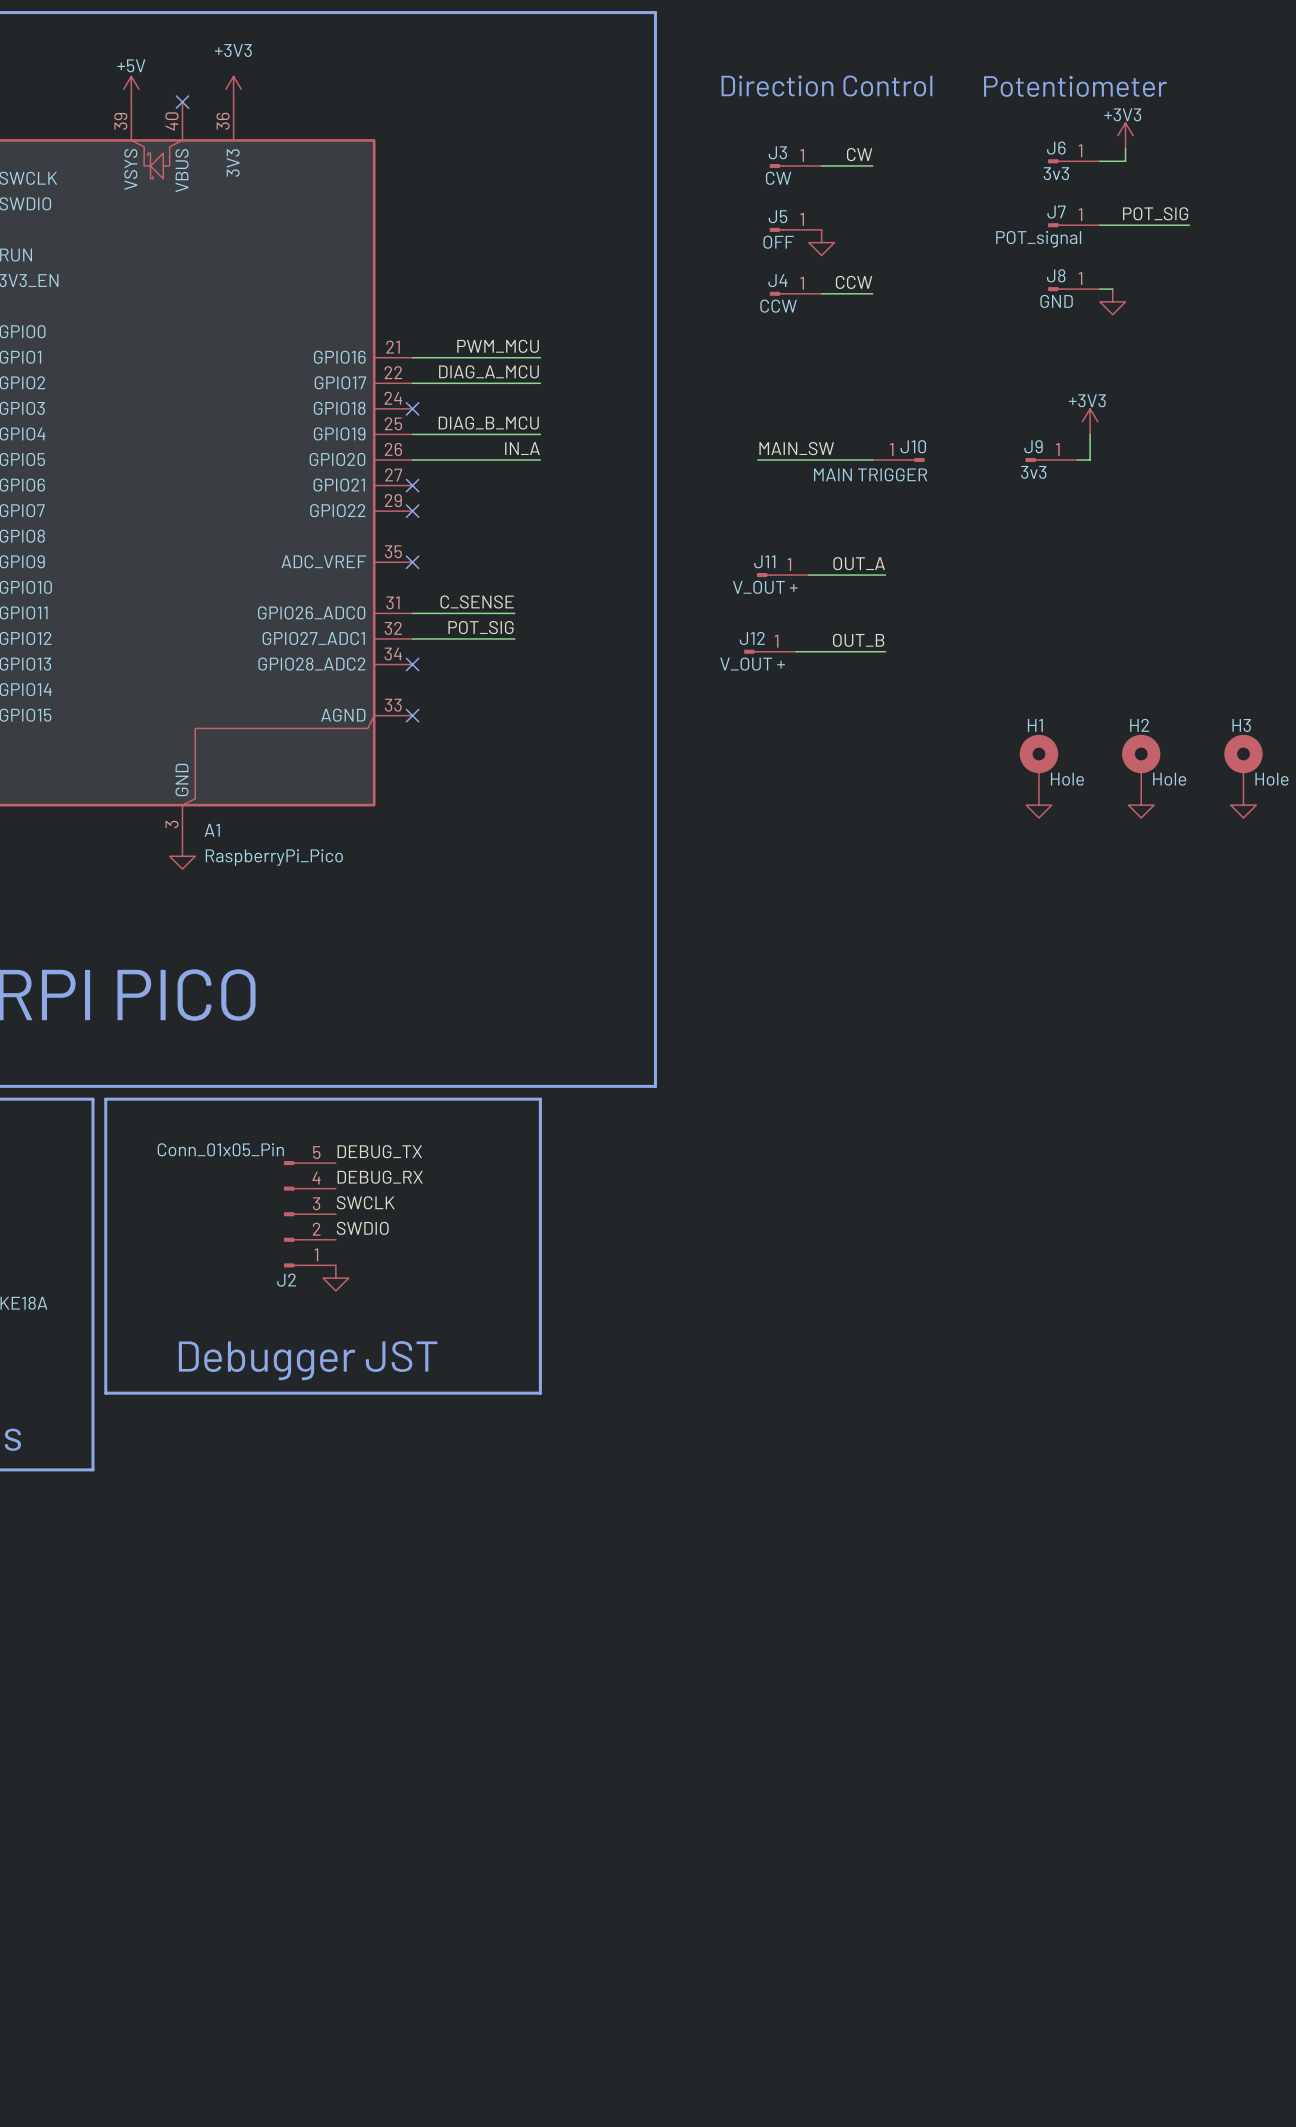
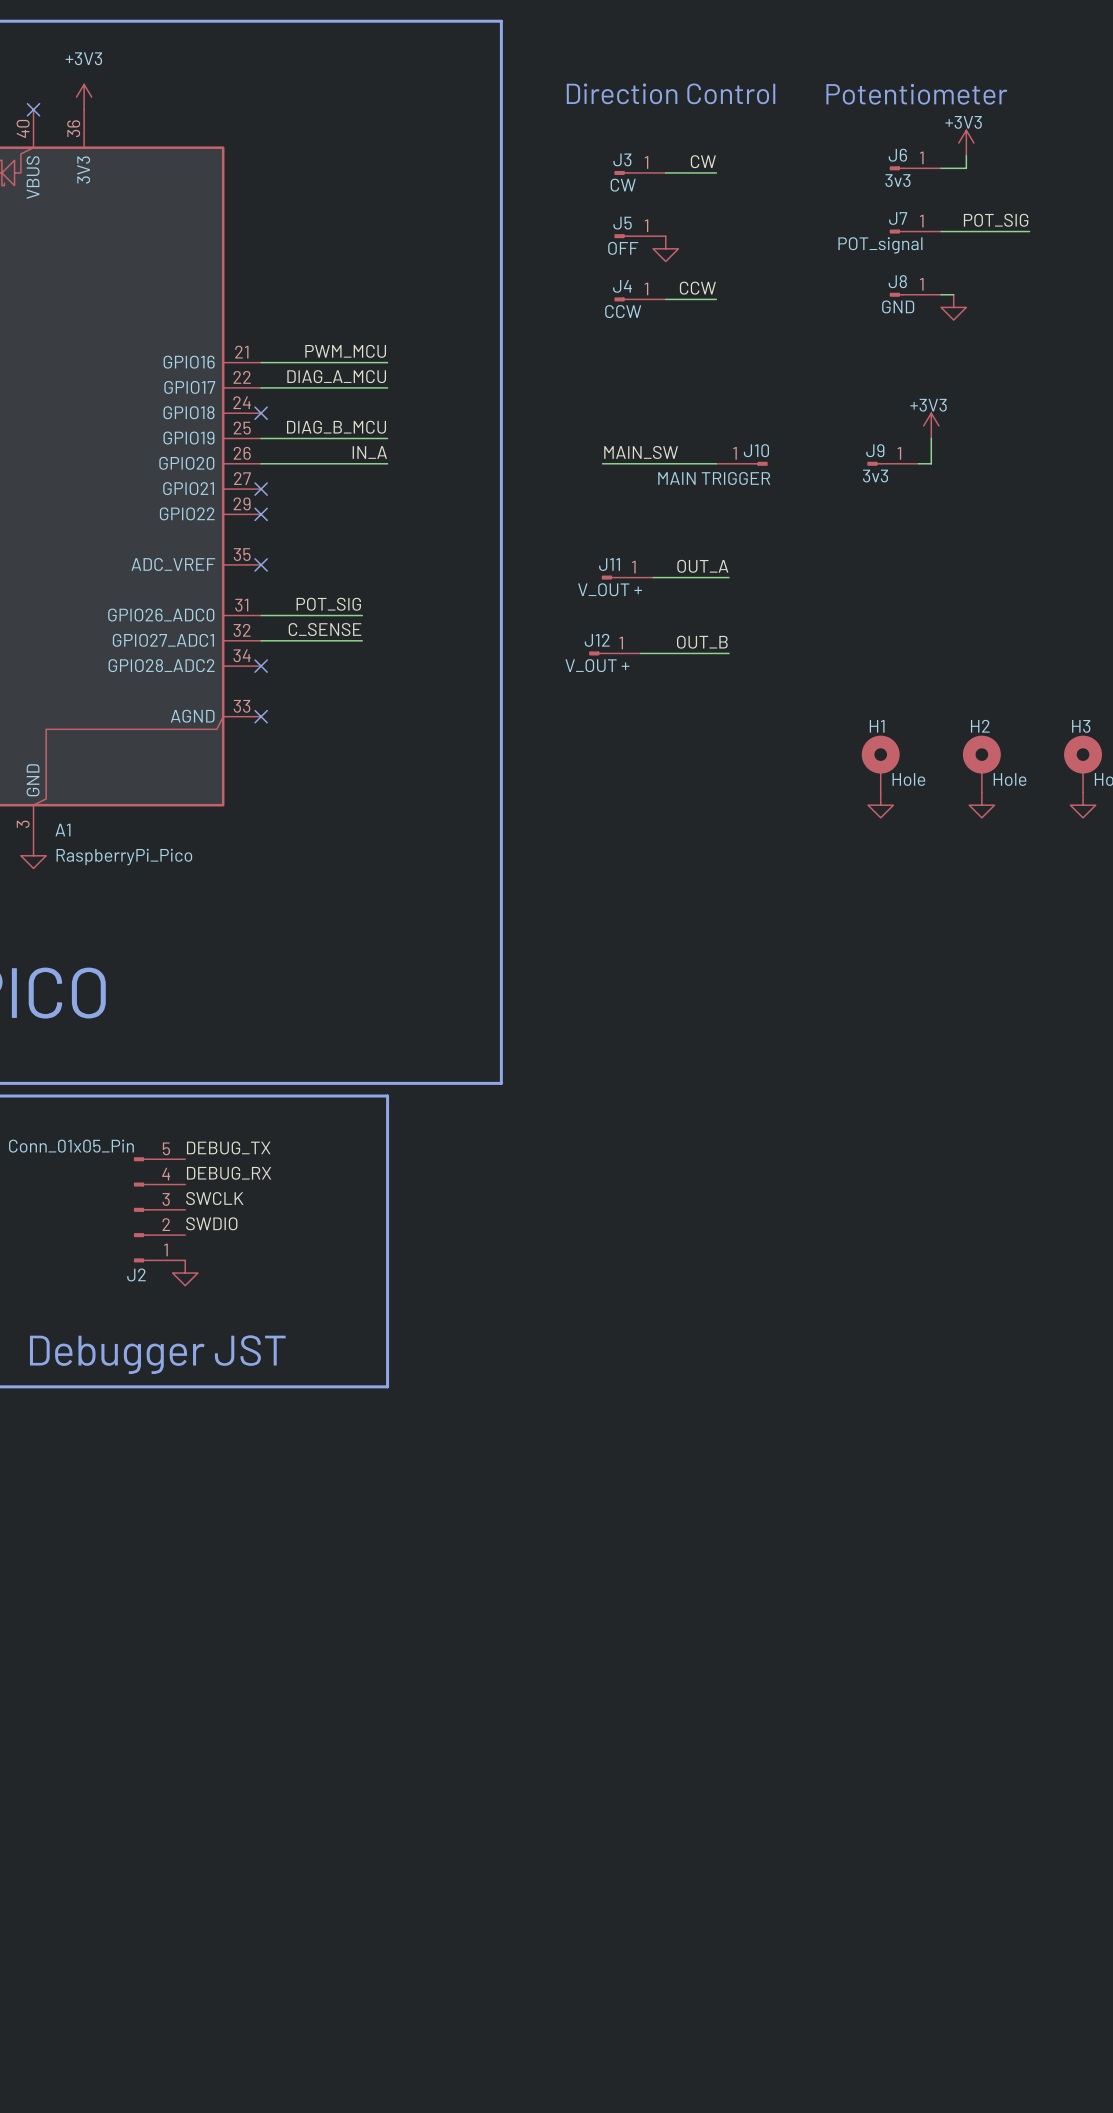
label: C_SENSE (477, 601) -> POT_SIG (328, 604)
label: POT_SIG (480, 627) -> C_SENSE (324, 629)

